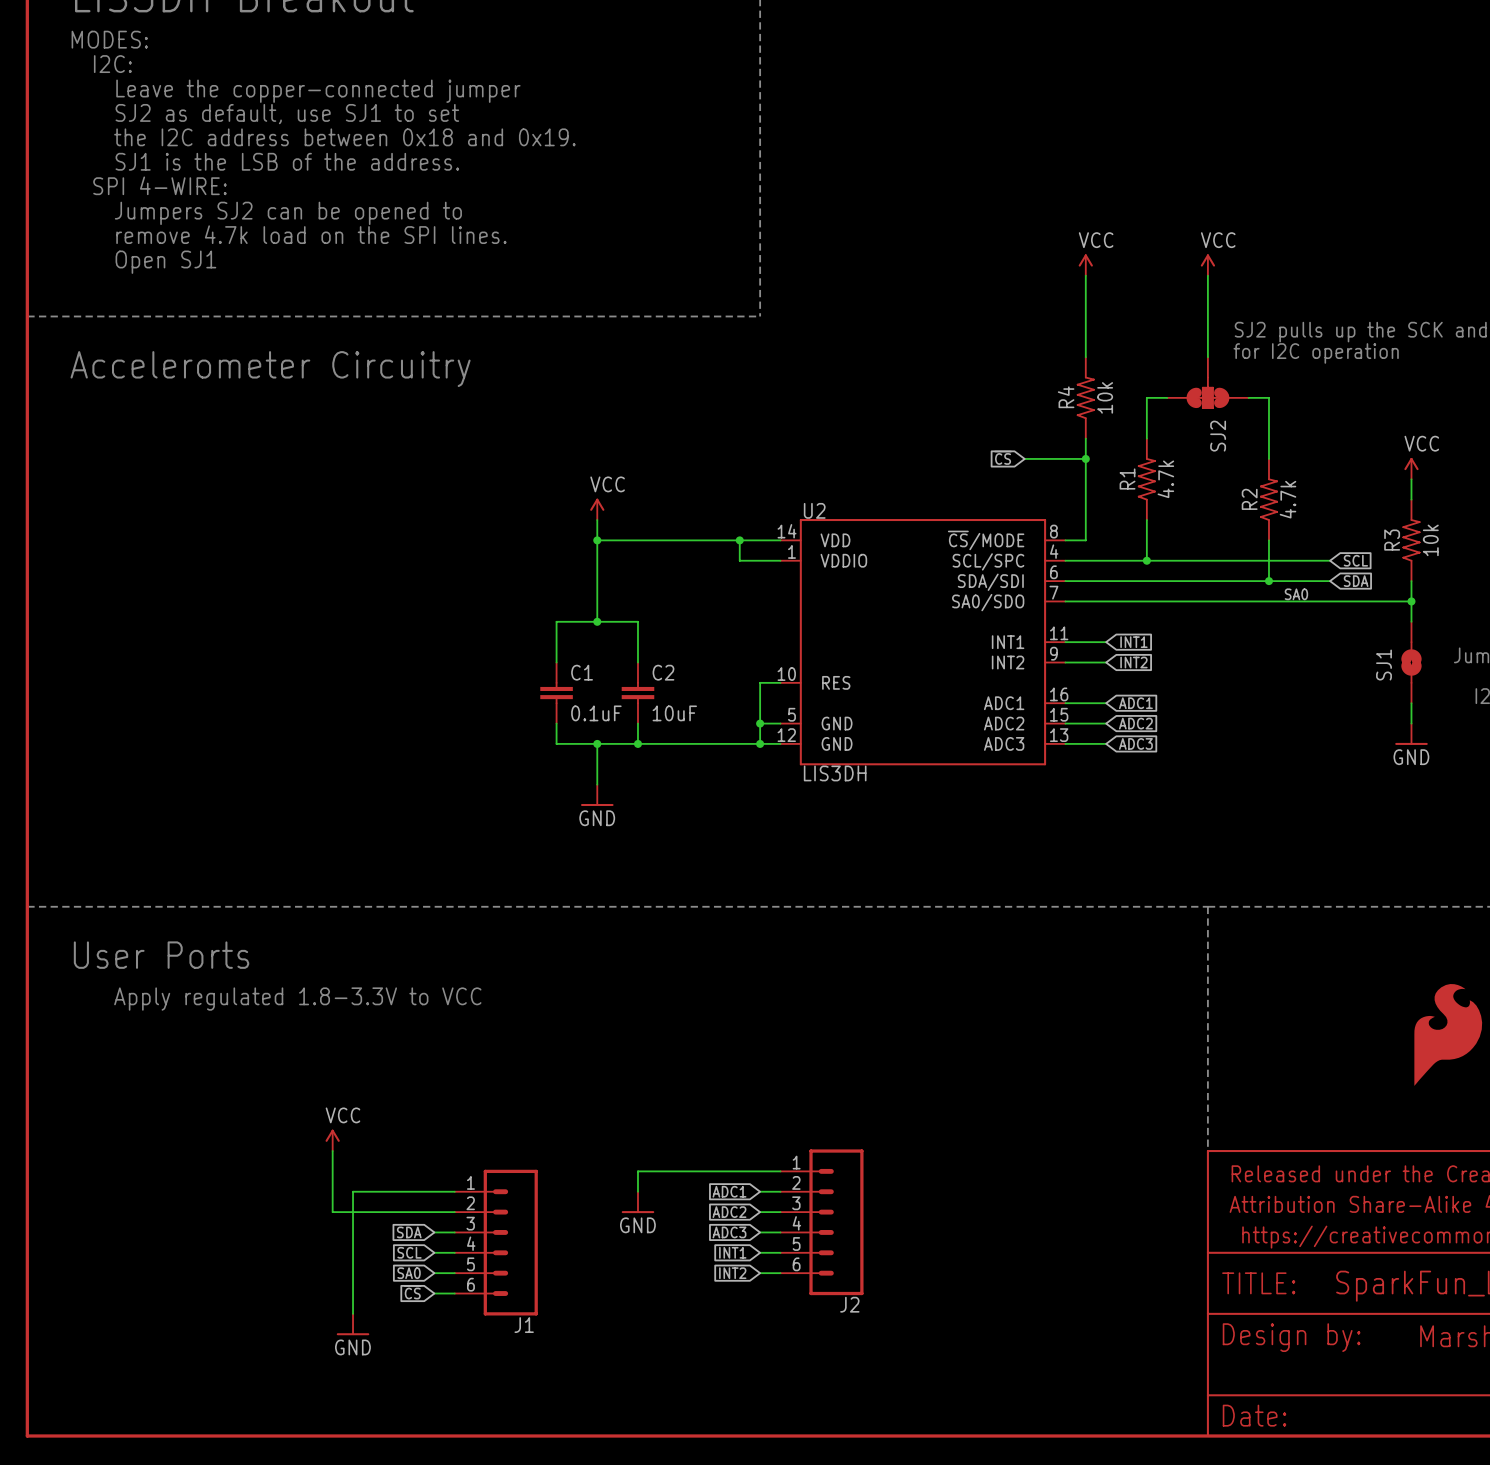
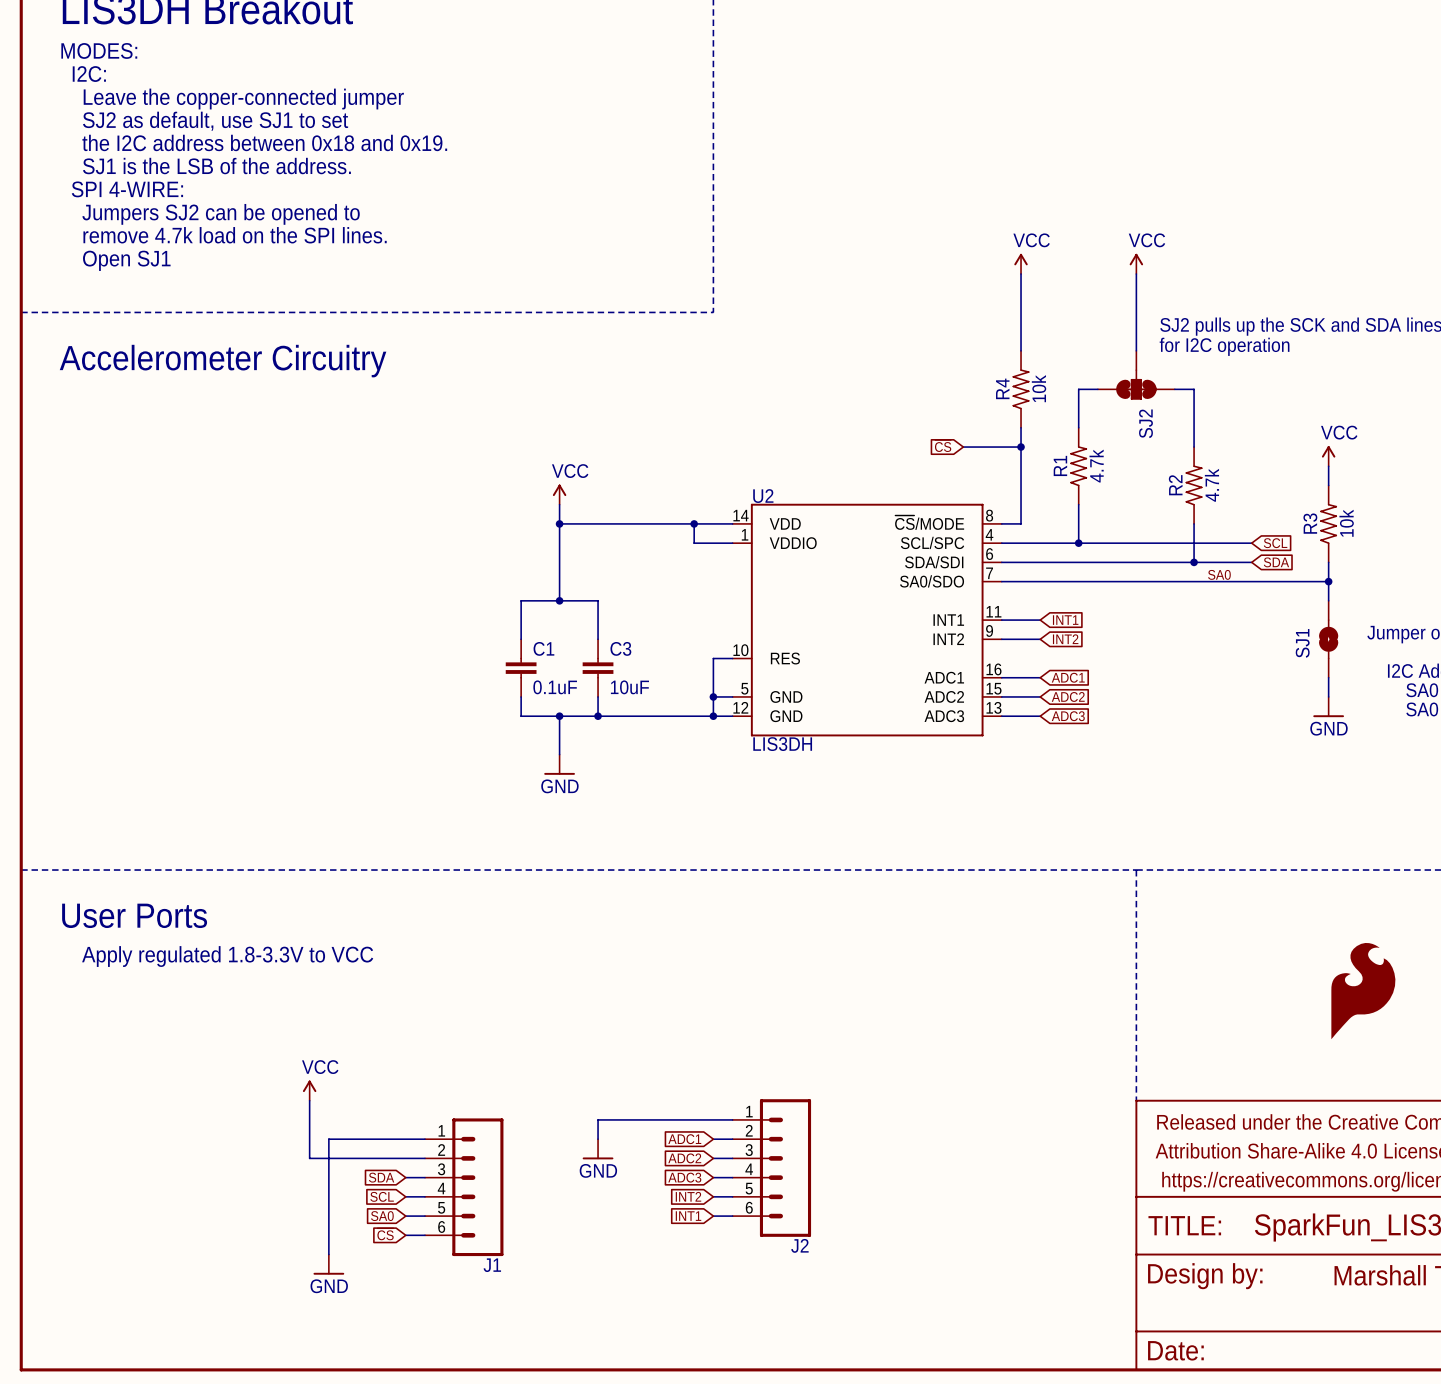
C2 name: C2 (663, 672) -> C3 (620, 648)
global label: INT1 (732, 1252) -> INT2 (688, 1196)
global label: INT2 (732, 1273) -> INT1 (688, 1216)

